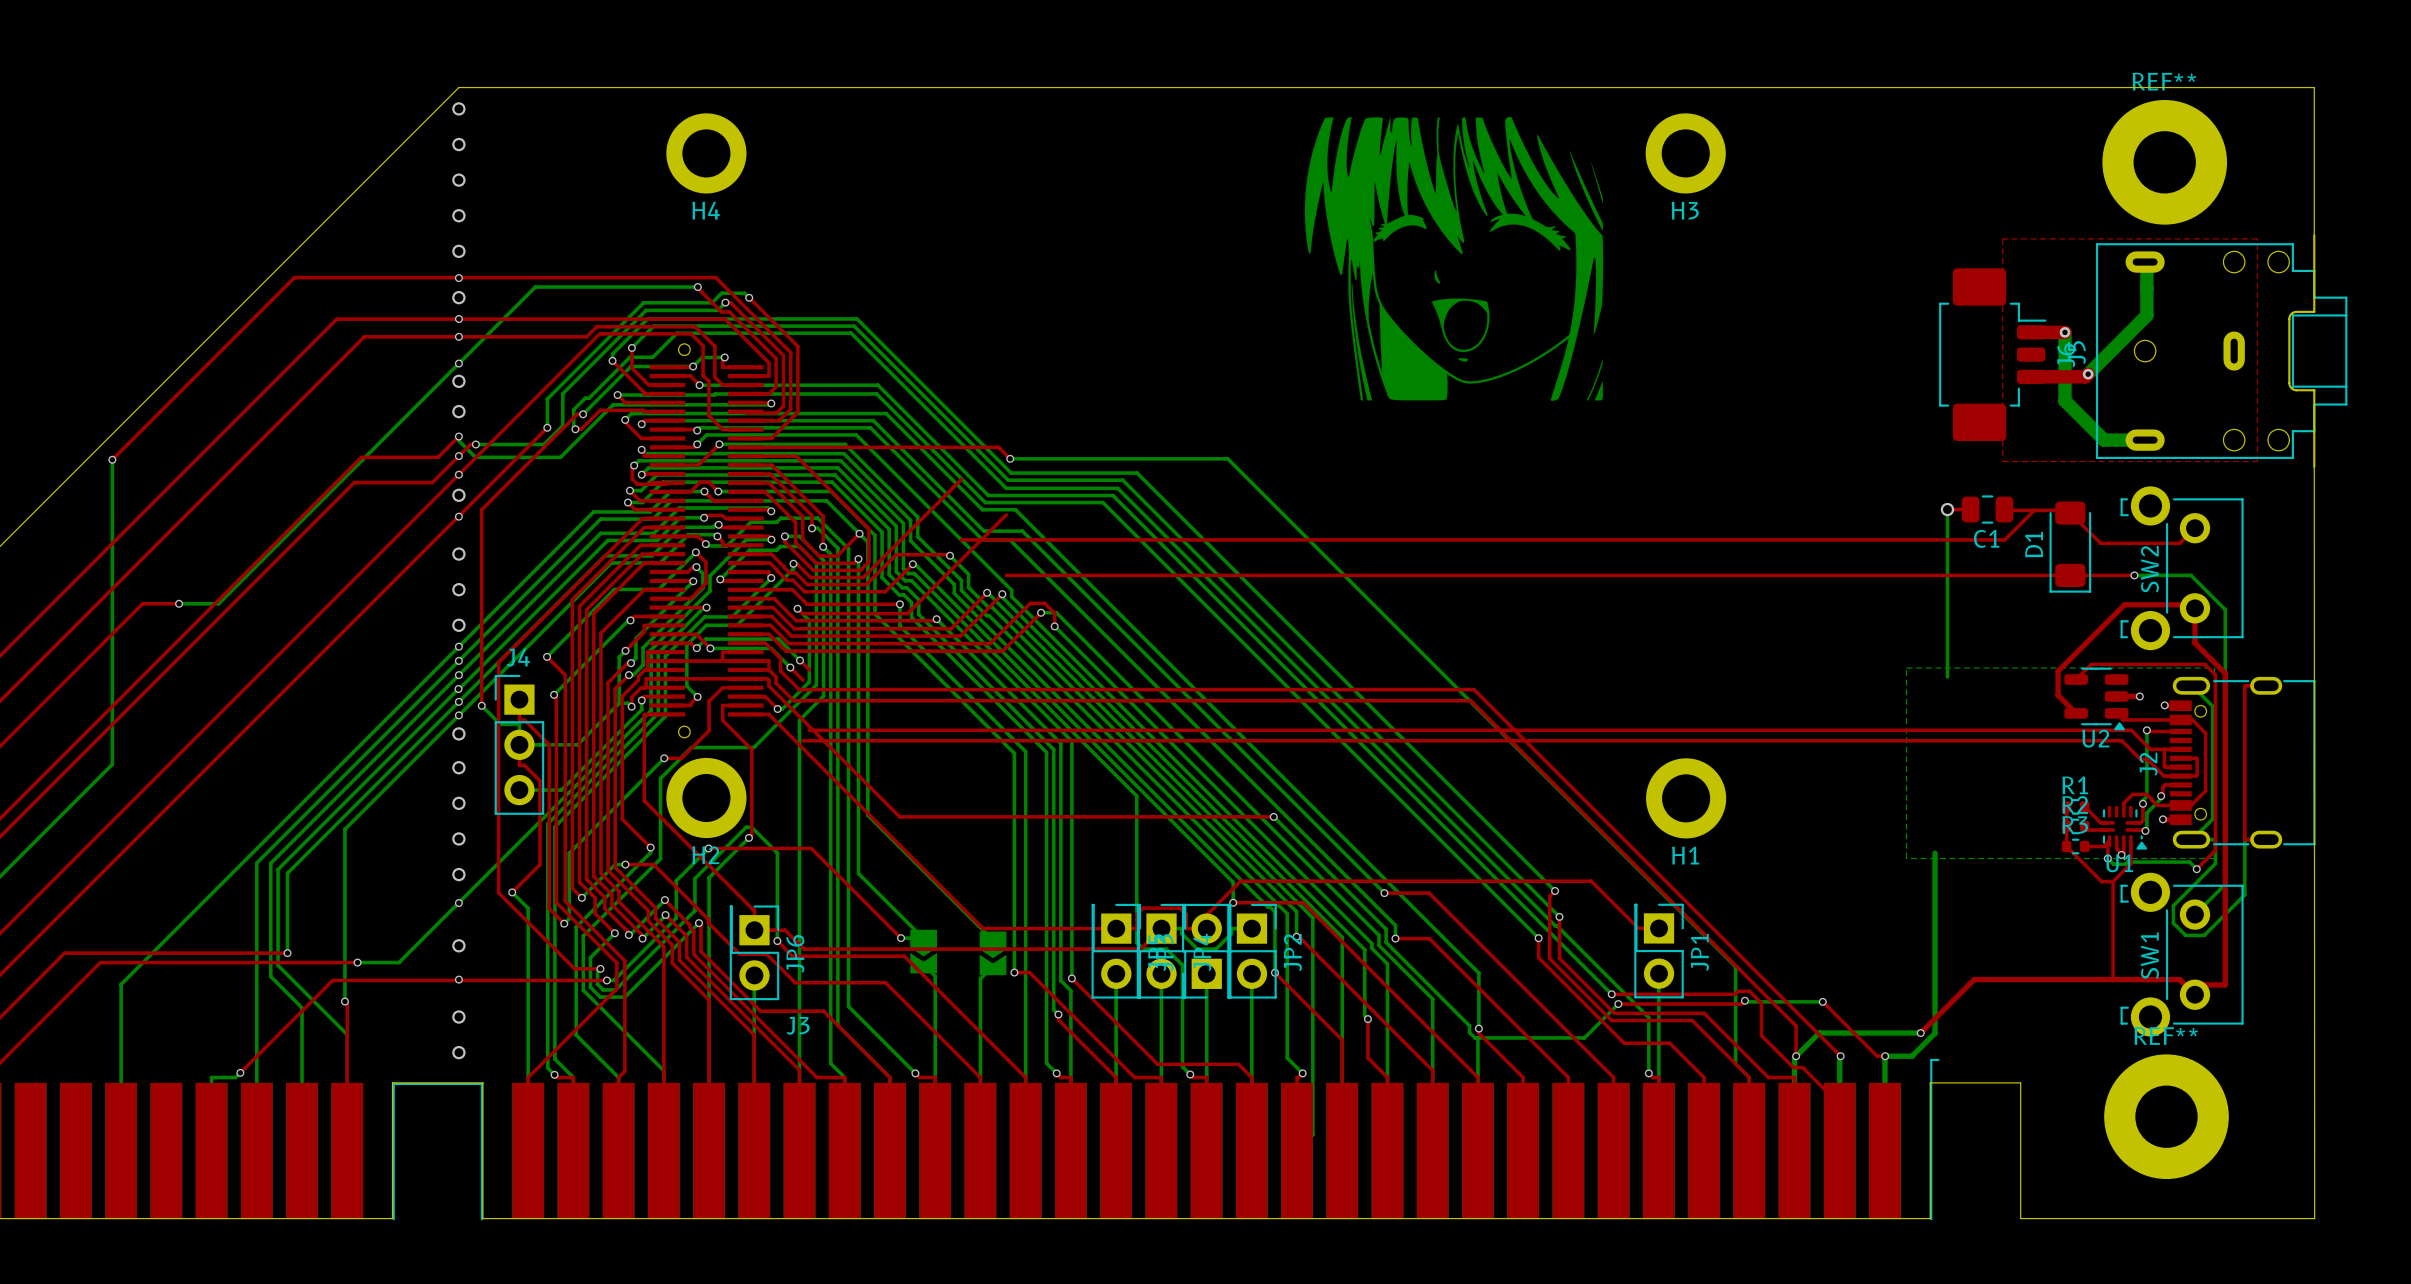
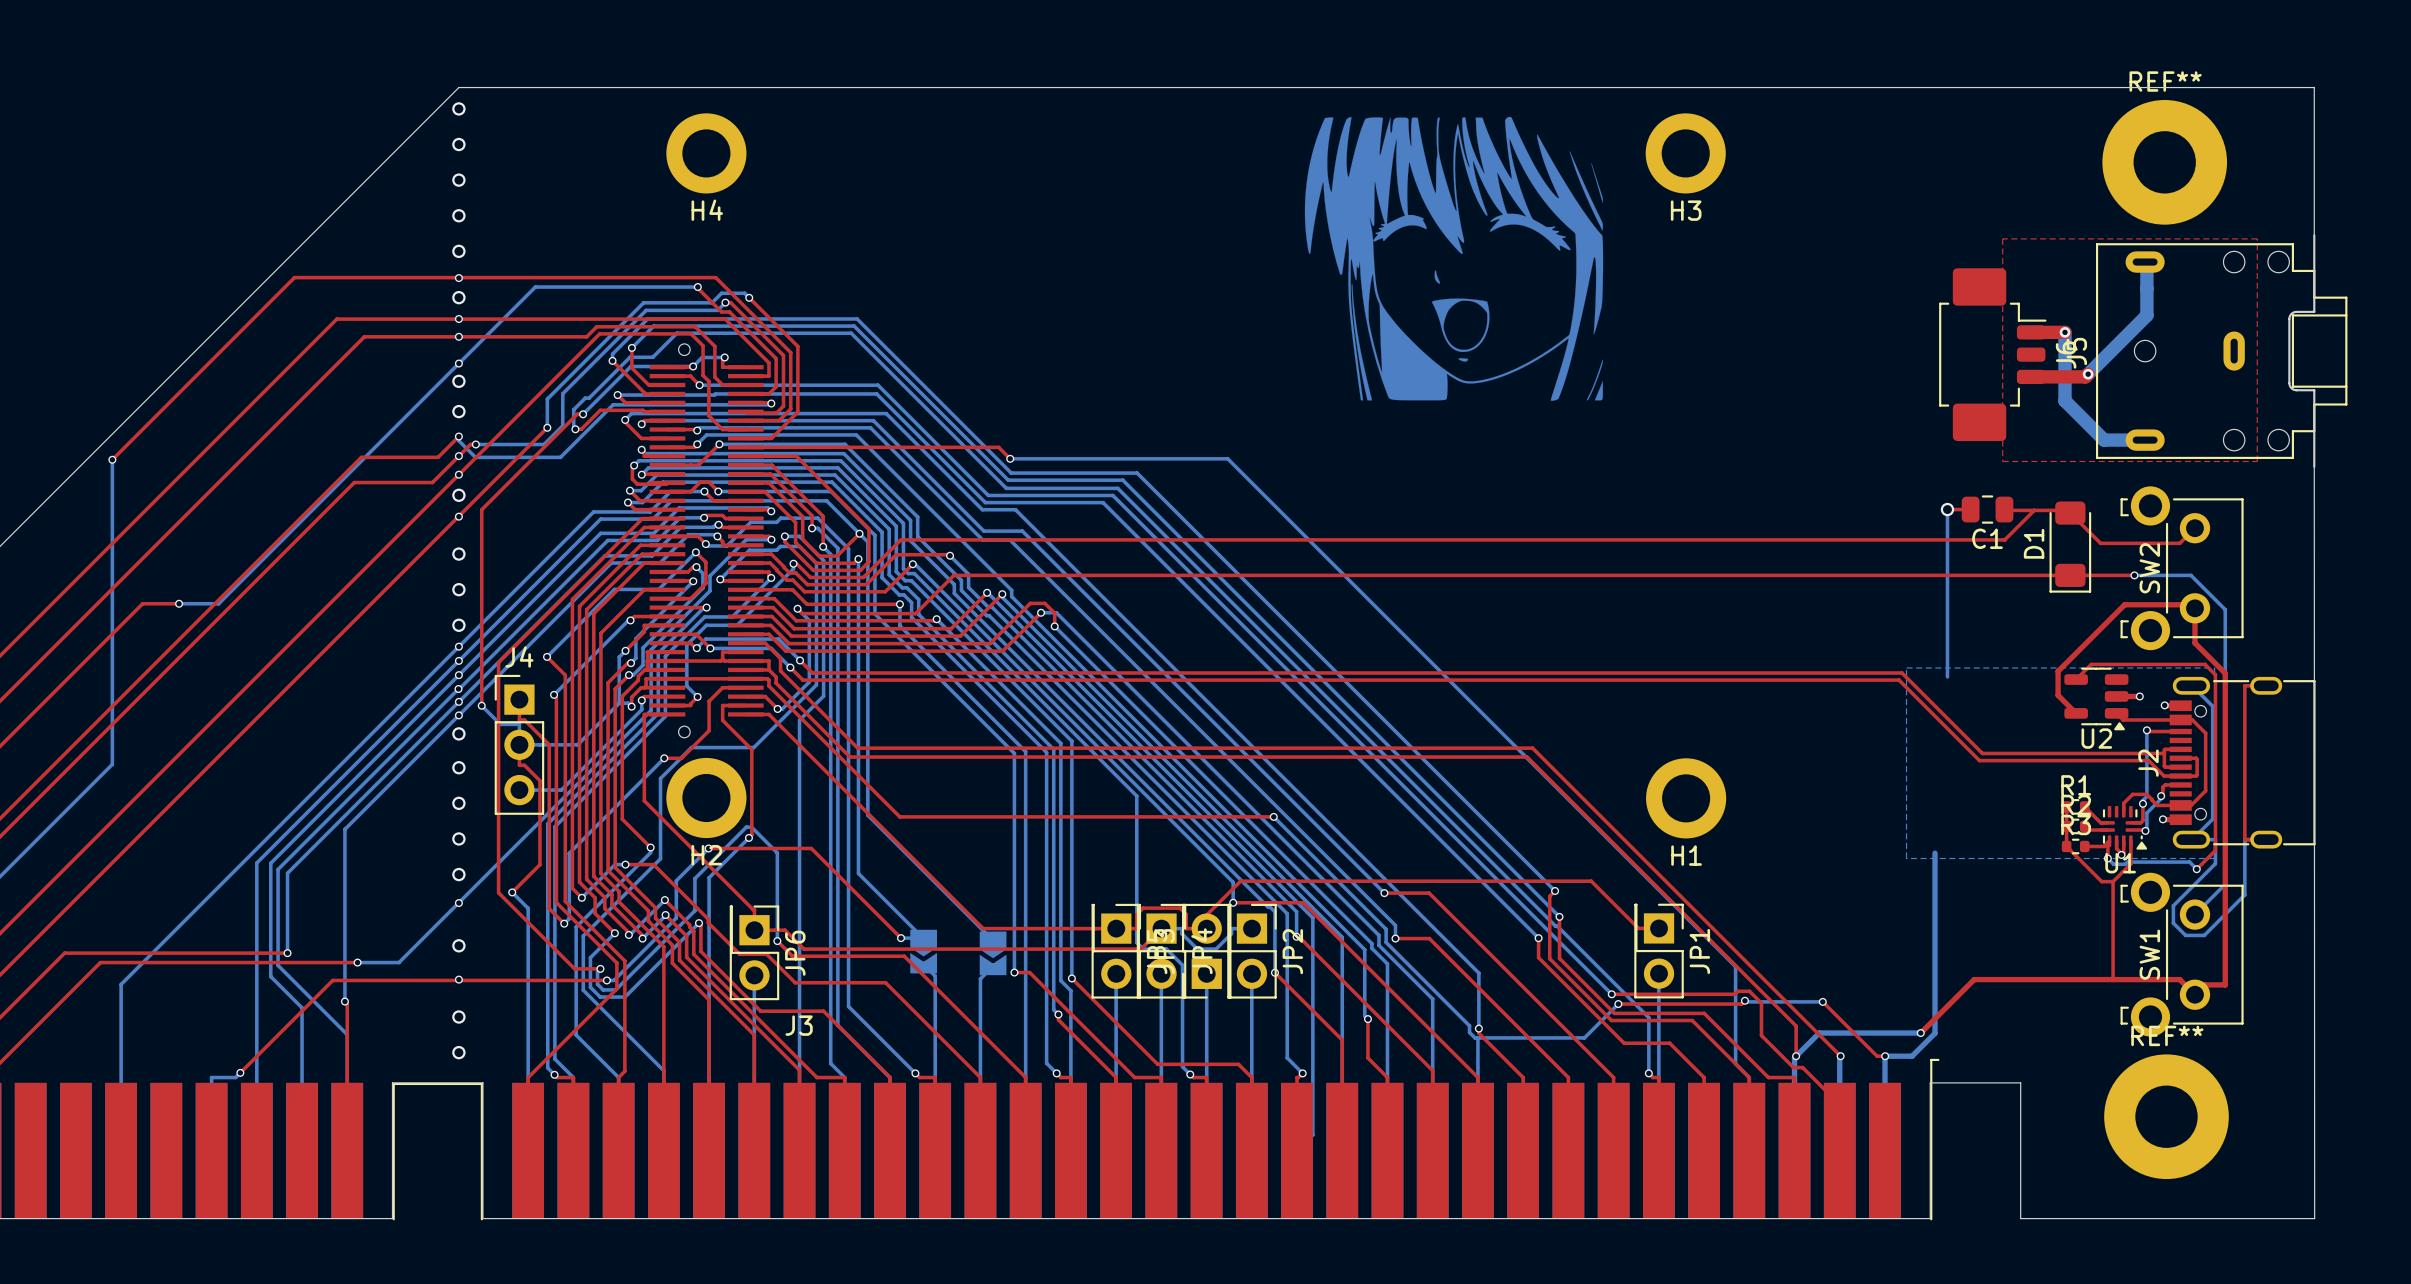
top track: (961, 479) (900, 539) -> (961, 539) (900, 539)
top track: (1006, 514) (907, 613) -> (1006, 575) (953, 575) (915, 613) (907, 613)
top track: none -> (809, 669) (812, 672) (1901, 672) (1982, 753) (2164, 753)
top track: (799, 689) (1474, 689) (1532, 748) -> (799, 689) (857, 748) (1532, 748)
top track: (793, 700) (1470, 700) (1527, 757) -> (793, 700) (850, 757) (1527, 757)
top track: (809, 730) (2131, 730) (2150, 749) (2165, 749) -> none
top track: (803, 740) (2121, 740) (2140, 759) (2148, 760) -> (802, 680) (1899, 680) (1979, 760) (2148, 760)

